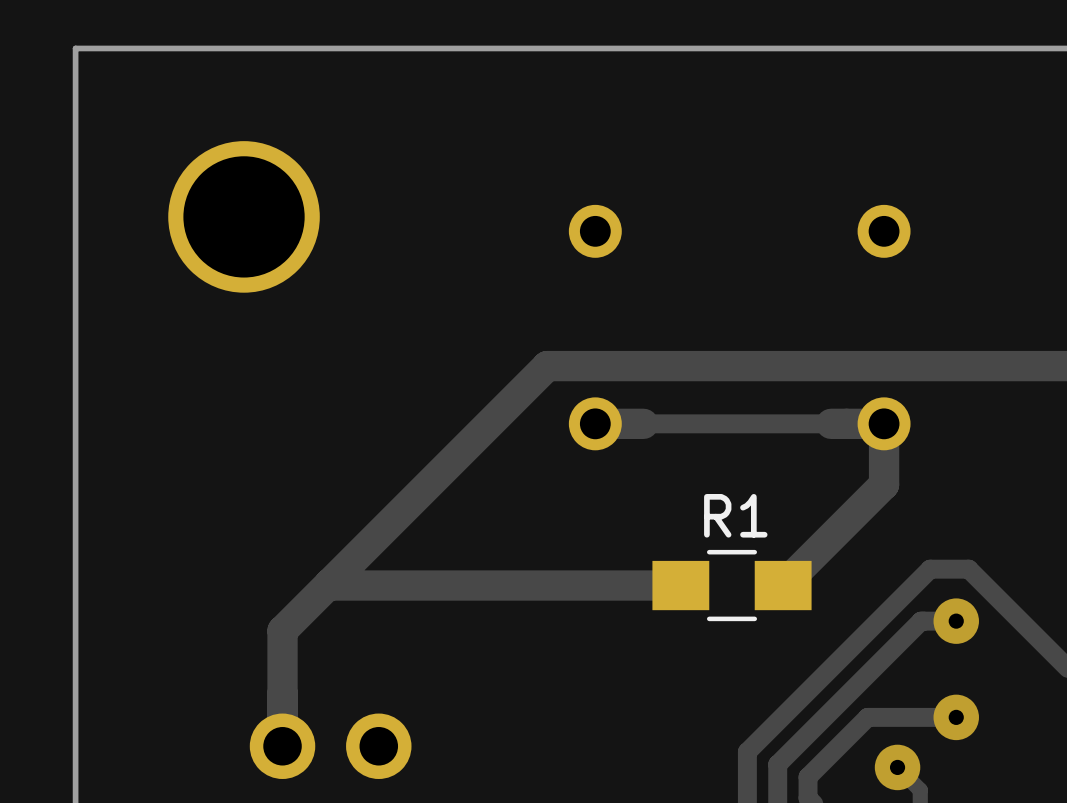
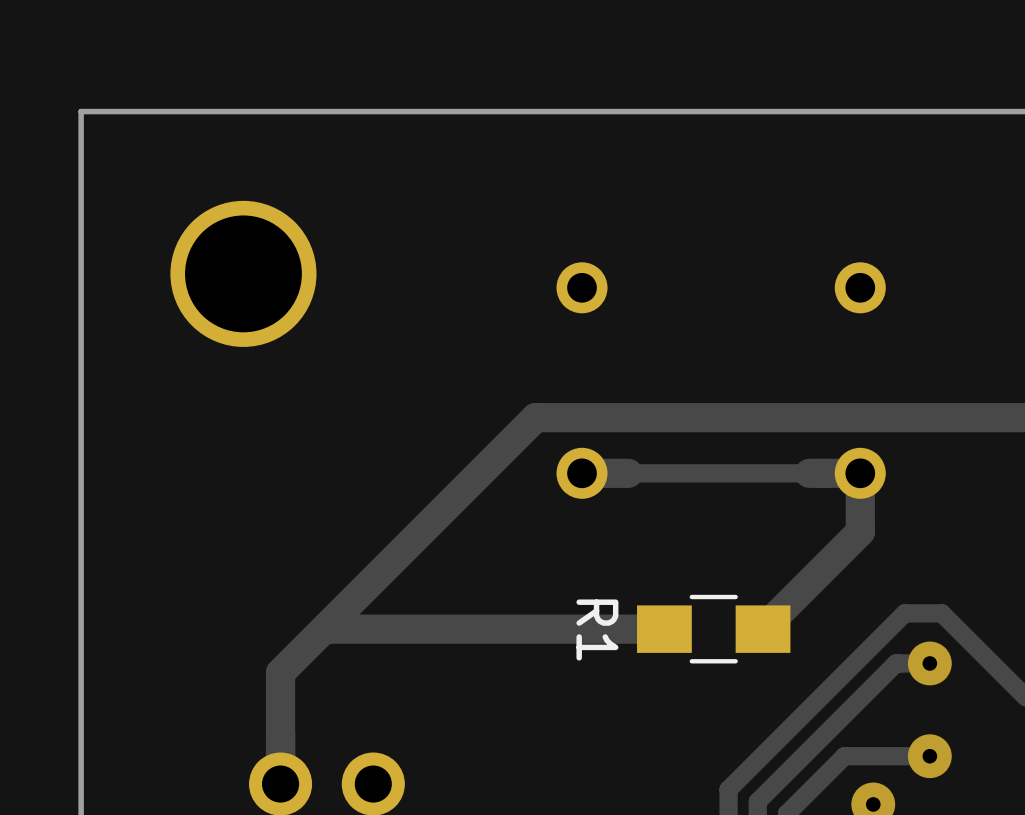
R1 name rotation: 0° (735, 515) -> 90° clockwise (597, 630)
R1 name position: R1 (735, 515) -> R1 (597, 630)

